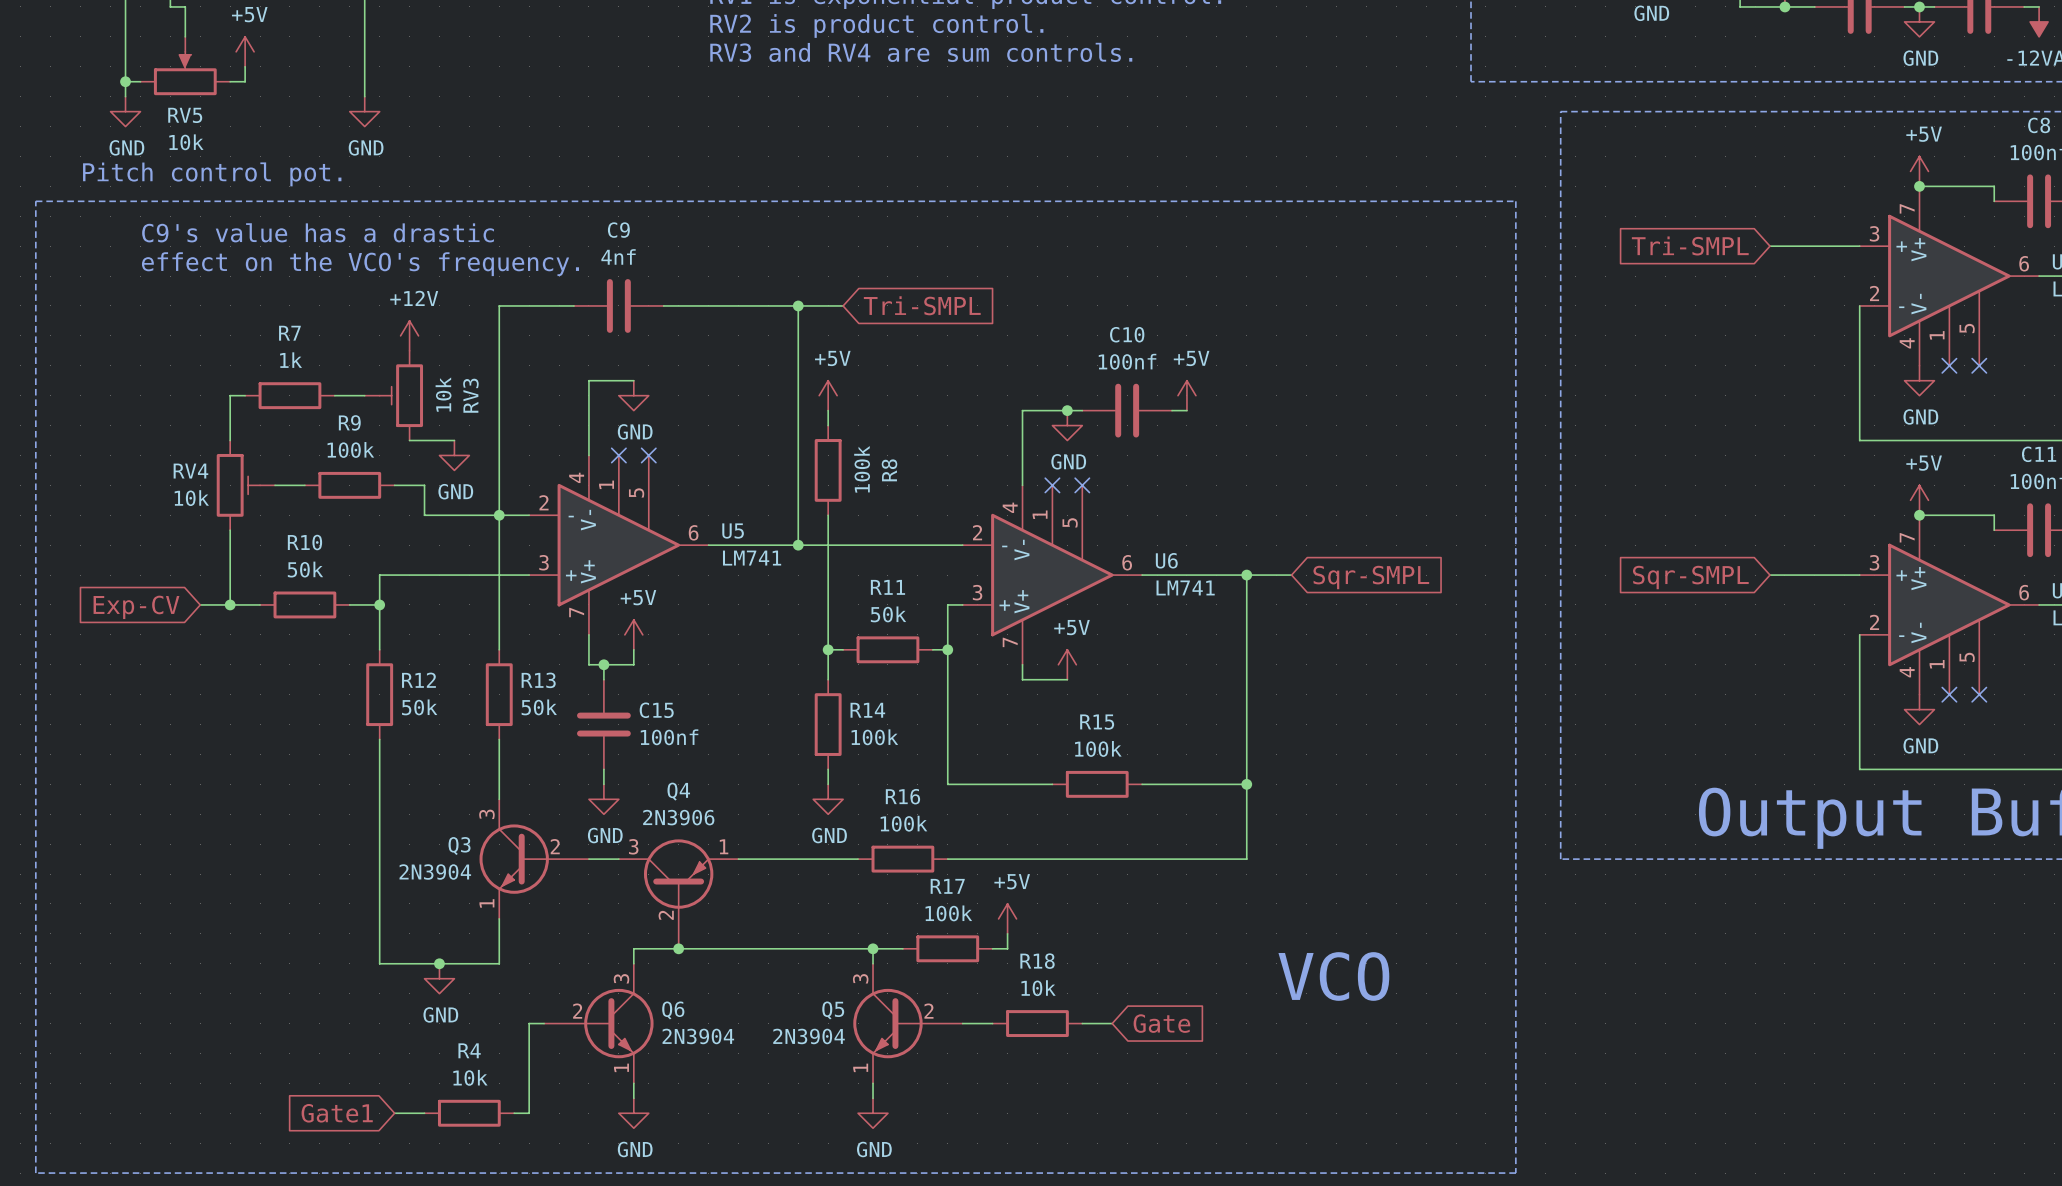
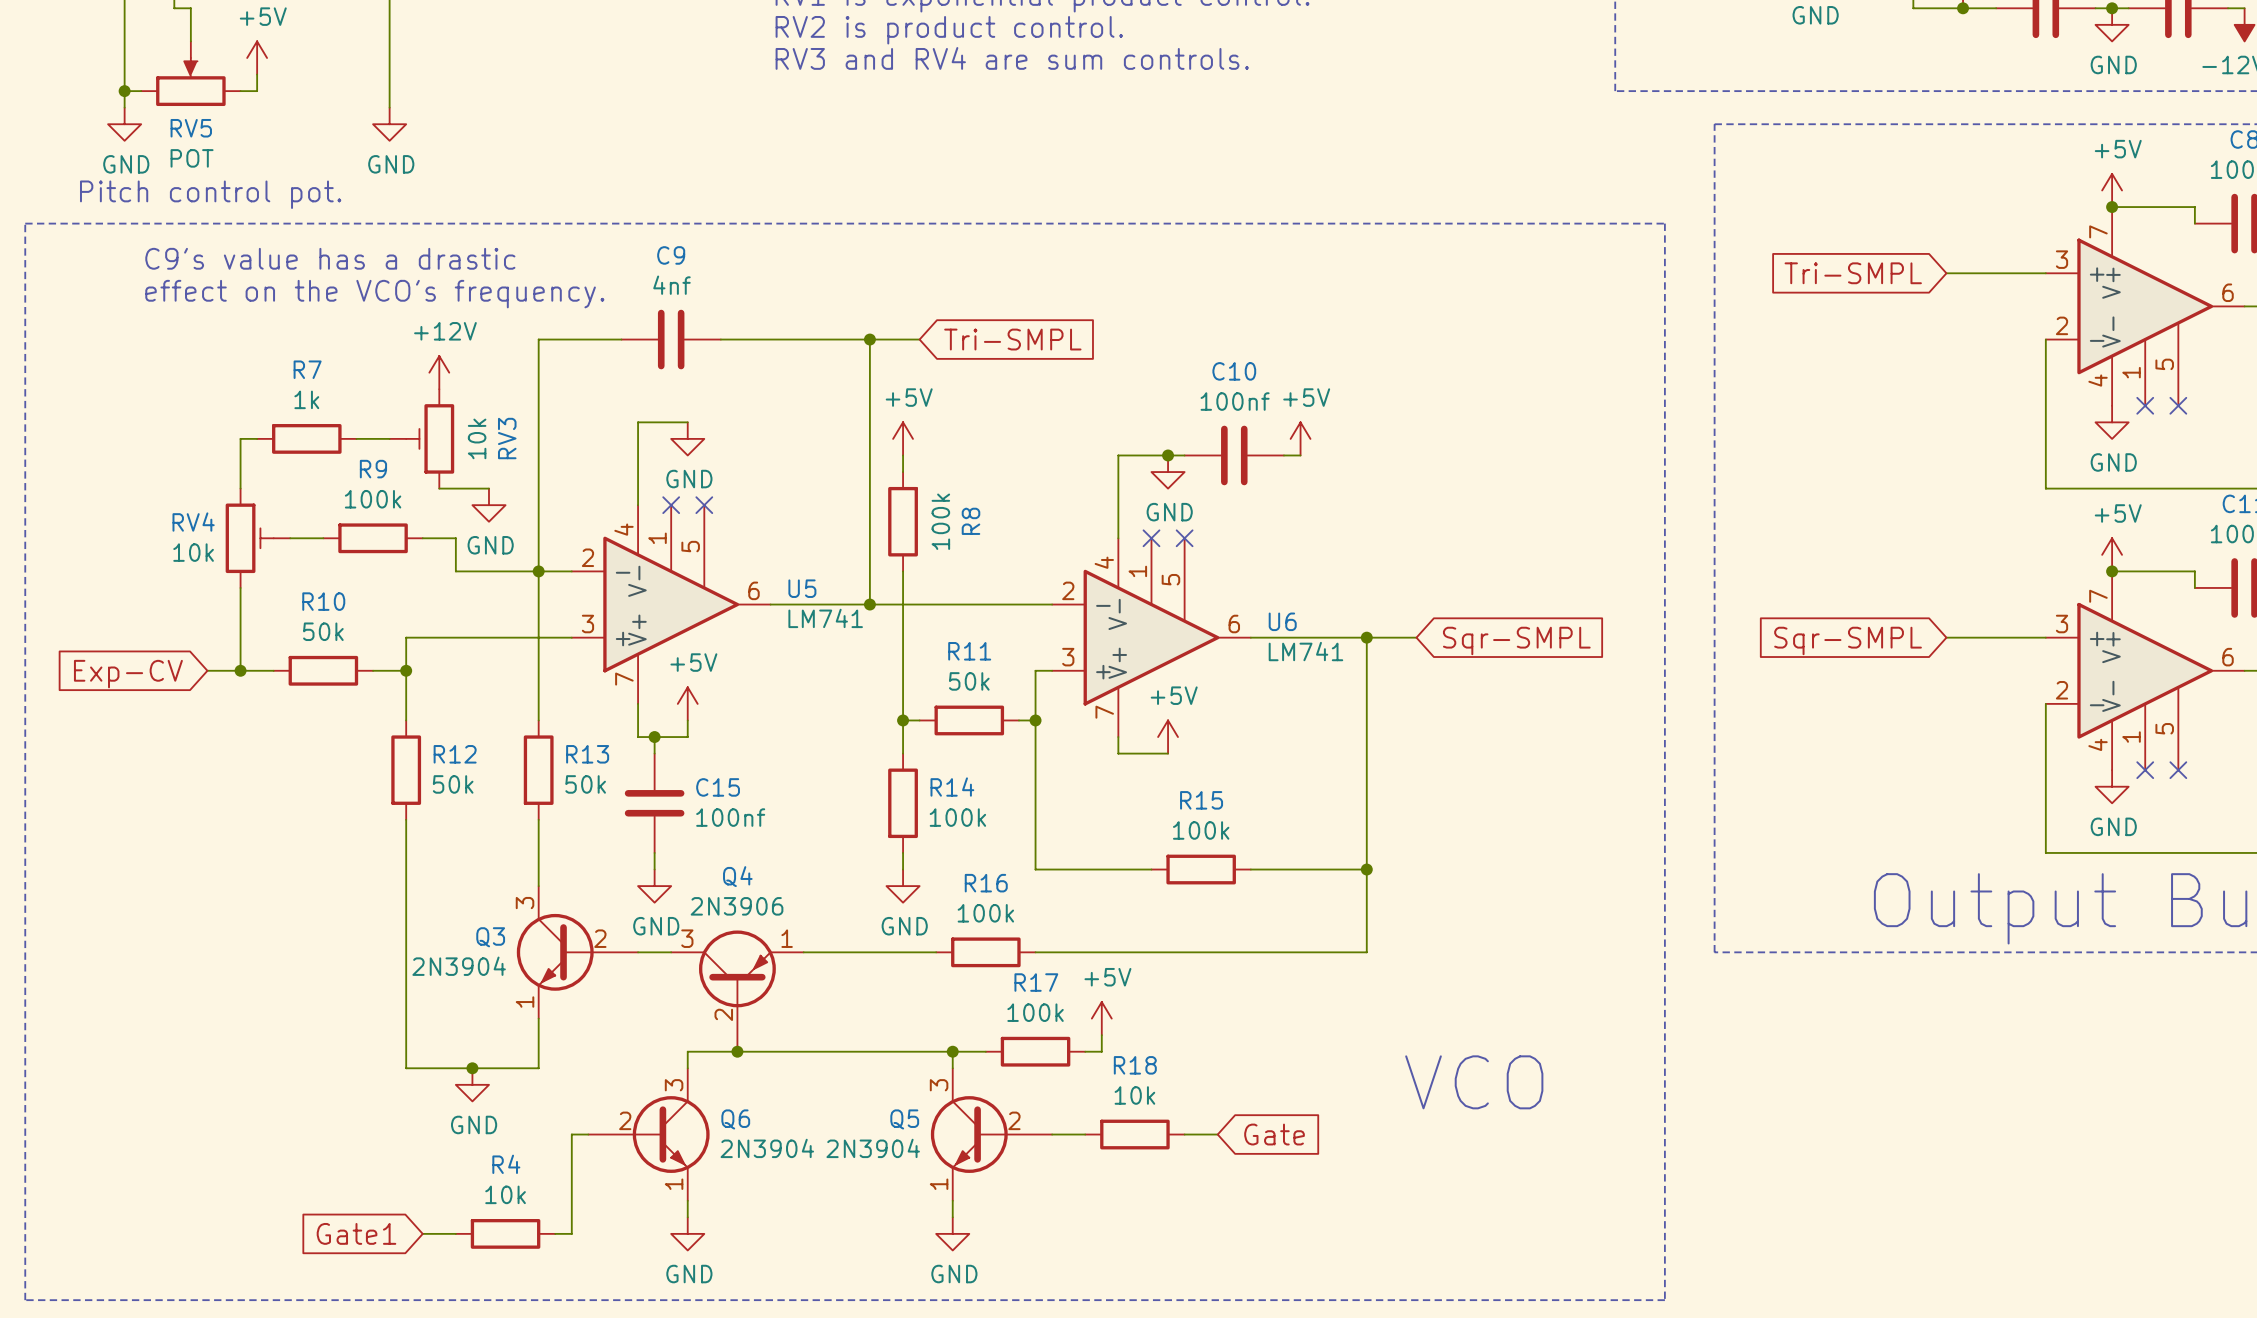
RV5 value: 10k (186, 142) -> POT (192, 158)

